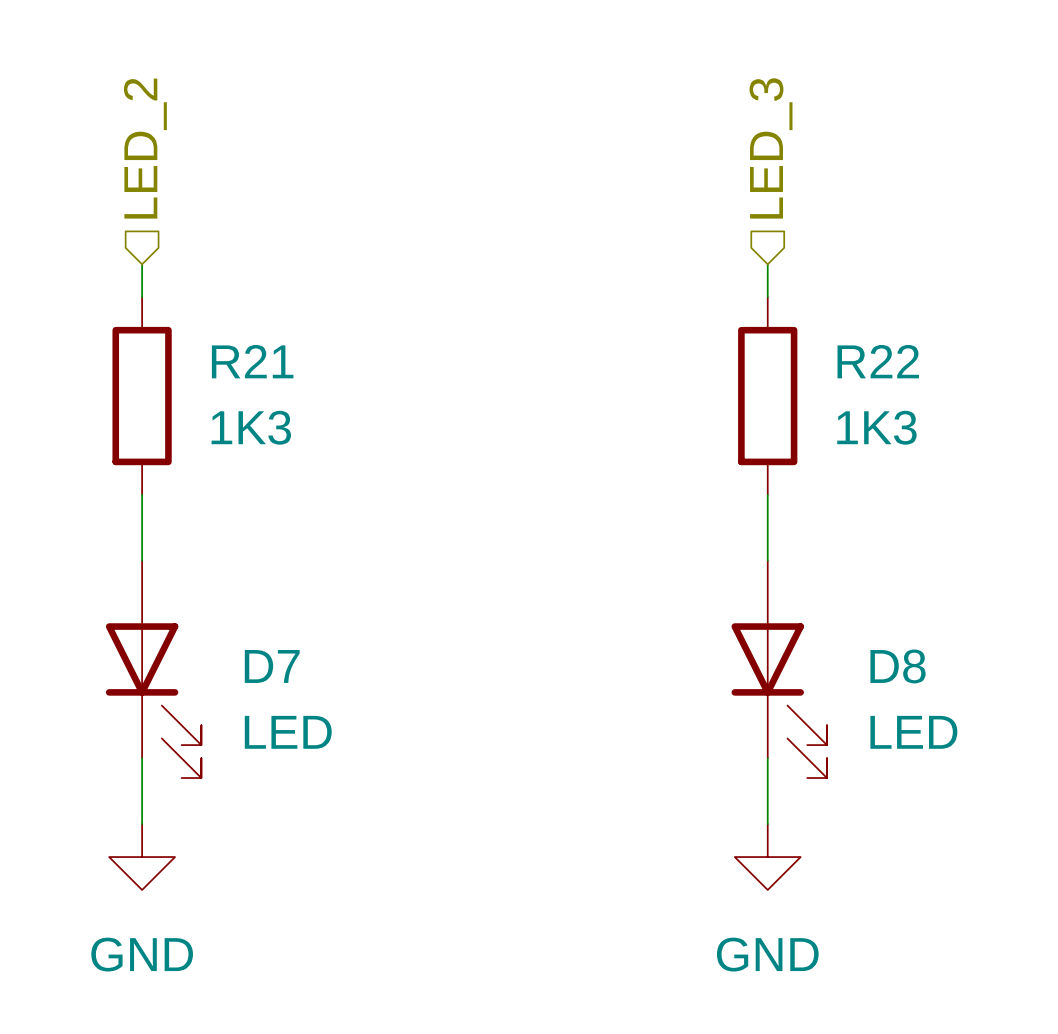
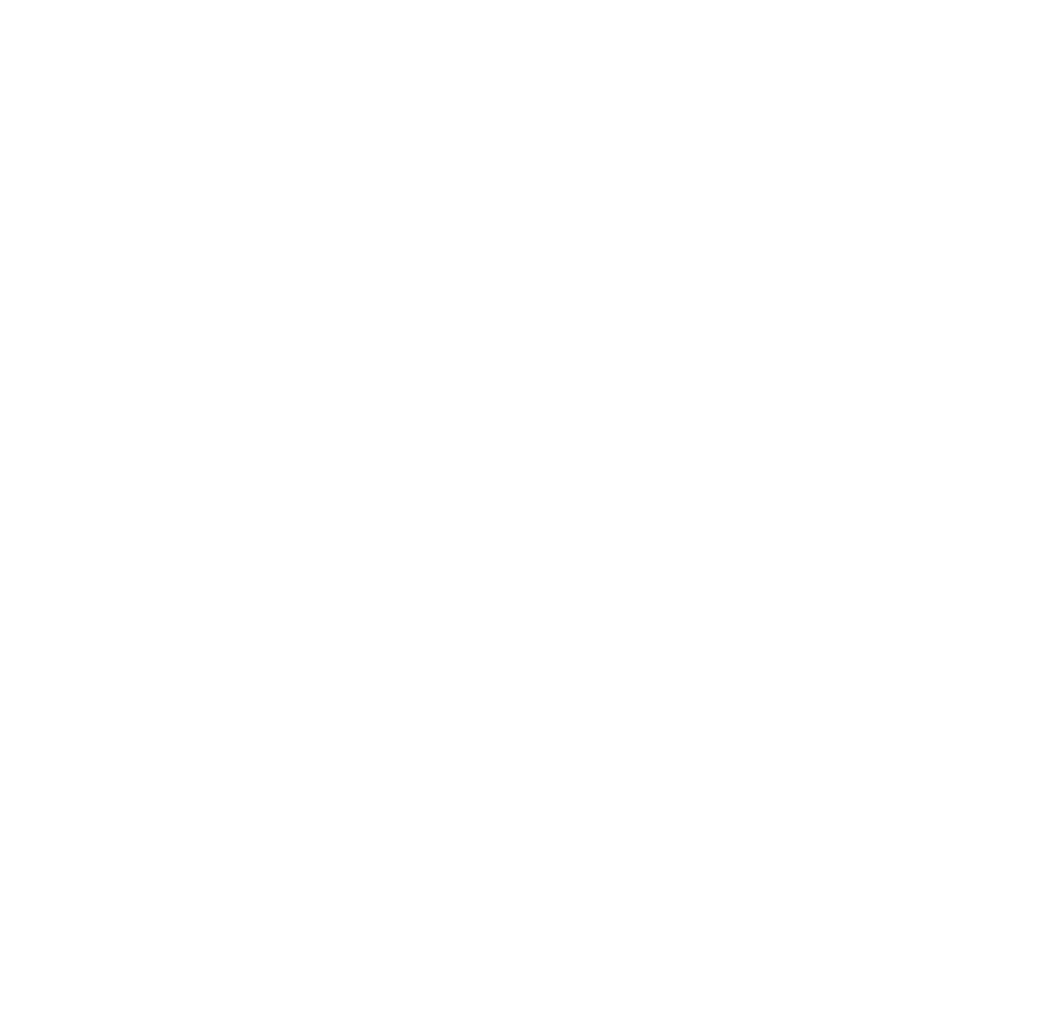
hierarchical label: LED_2 (145, 148) -> none
hierarchical label: LED_3 (771, 148) -> none
wire: (142, 264) (142, 297) -> none
wire: (767, 264) (767, 297) -> none
R21: 1K3 (142, 396) -> none
R22: 1K3 (767, 396) -> none
wire: (142, 494) (142, 560) -> none
wire: (767, 494) (767, 560) -> none
D7: LED (153, 669) -> none
D8: LED (779, 669) -> none
wire: (142, 758) (142, 824) -> none
wire: (767, 758) (767, 824) -> none
power symbol: GND (142, 857) -> none
power symbol: GND (767, 857) -> none

